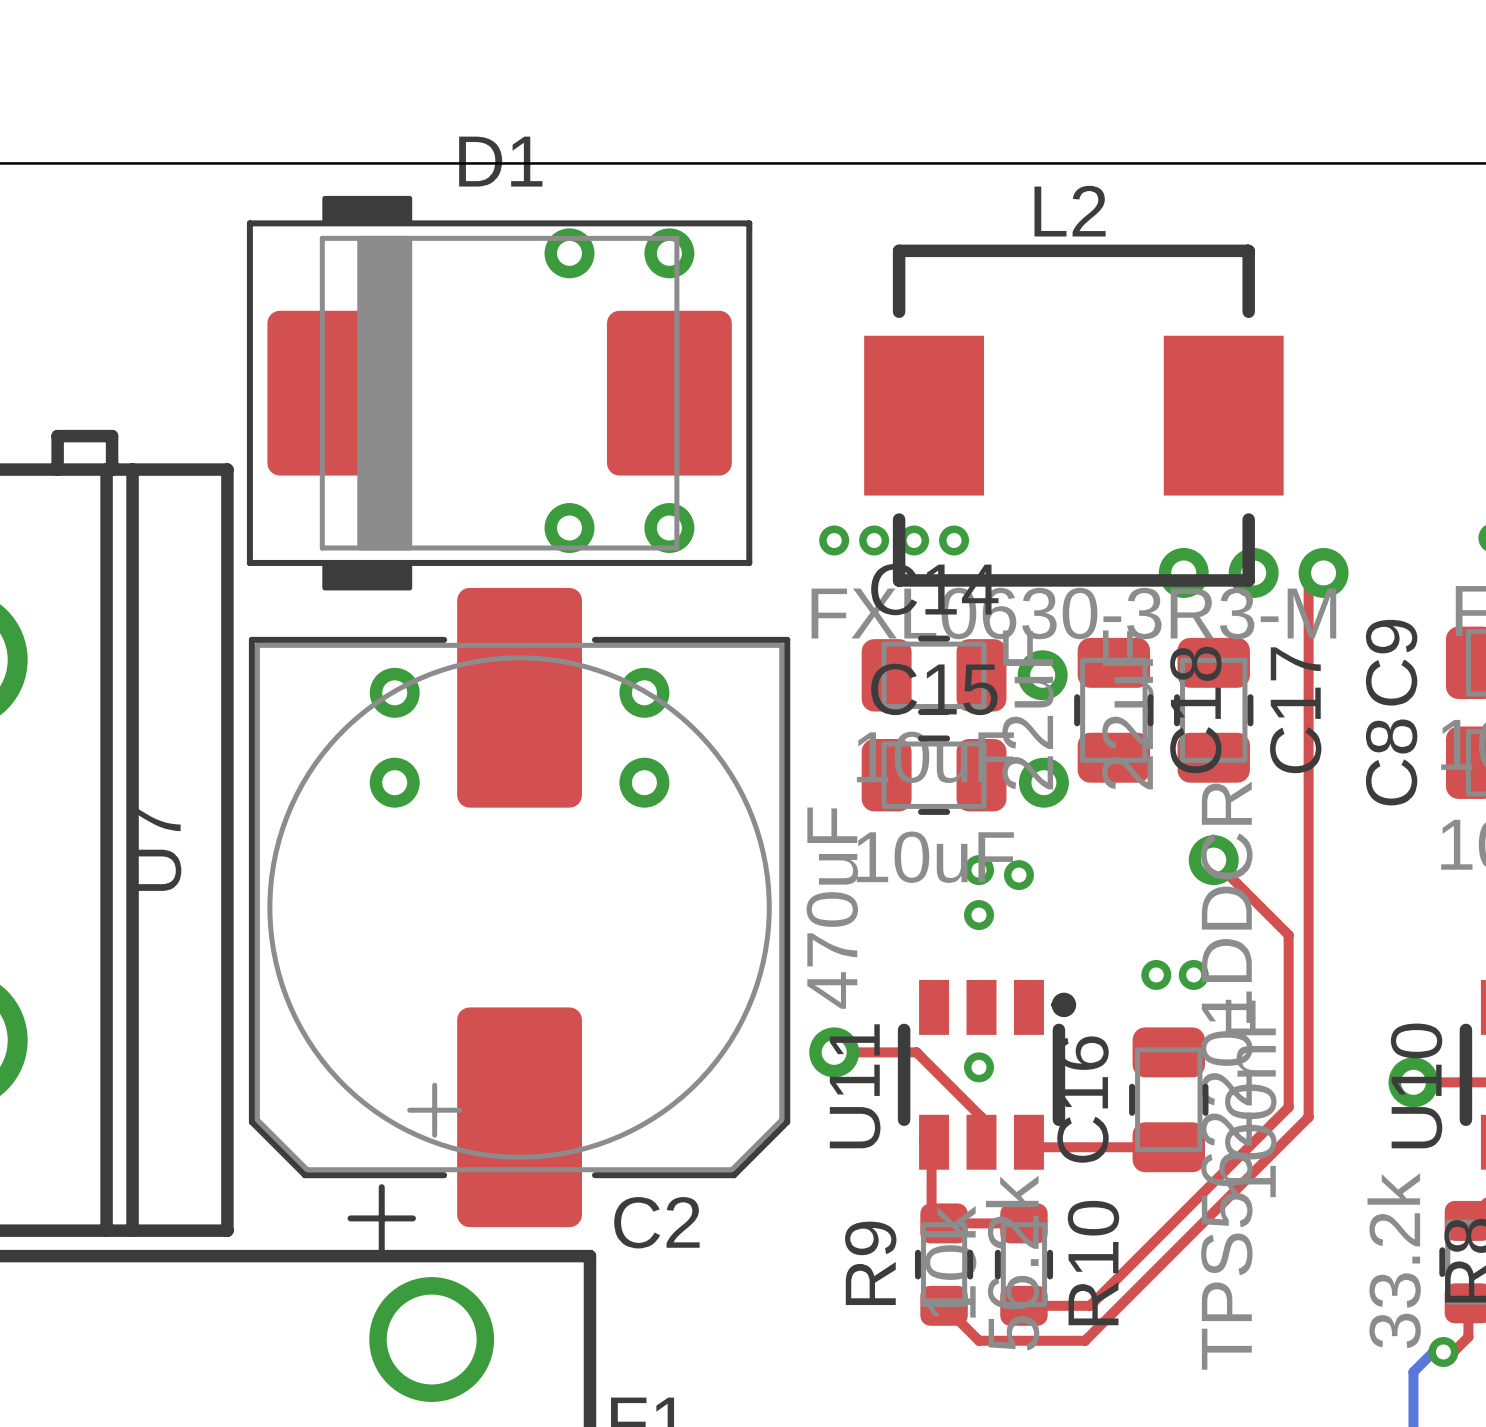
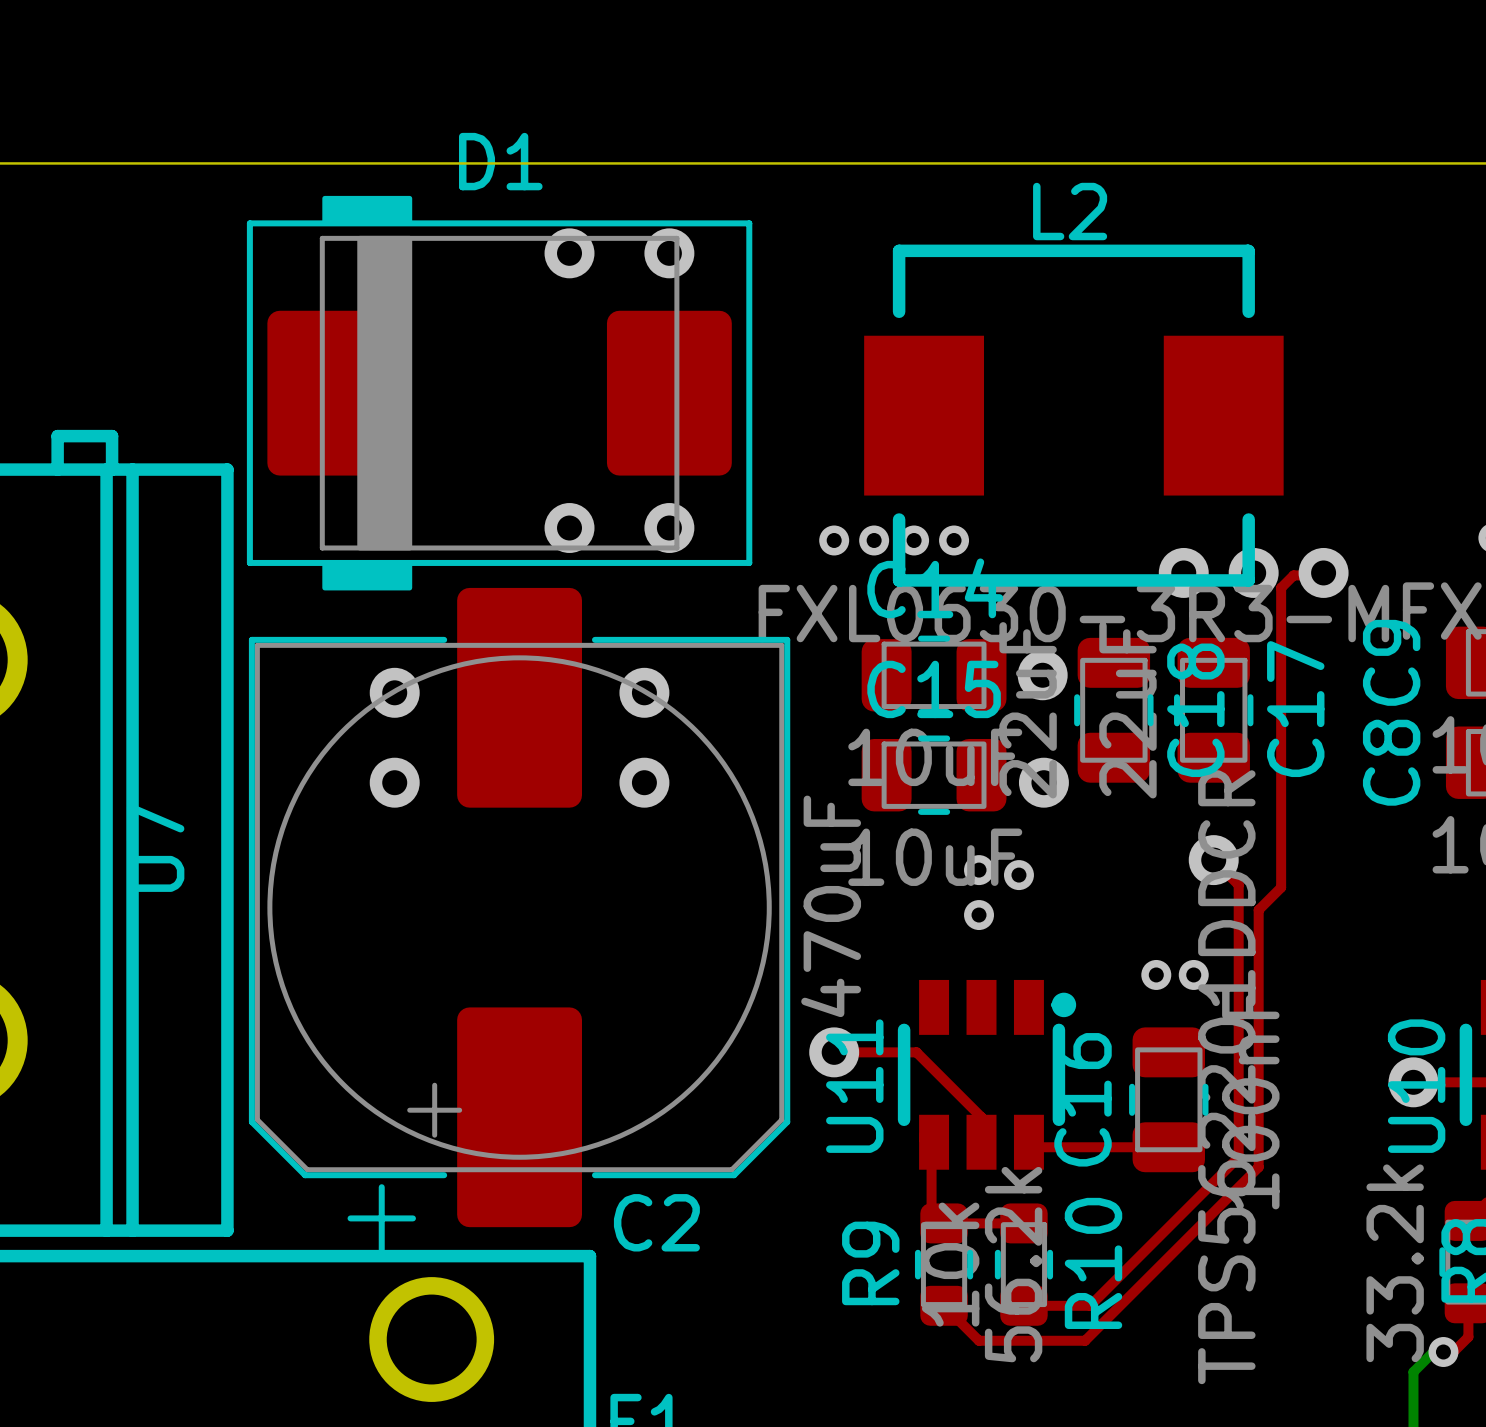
top track: (1308, 575) (1308, 1117) (1258, 1167) -> (1308, 575) (1293, 575) (1281, 587) (1281, 887) (1258, 910) (1258, 1167)
top track: (1238, 885) (1288, 935) (1288, 1107) (1238, 1157) -> (1238, 885) (1238, 1157)
via: (979, 1067) -> none

